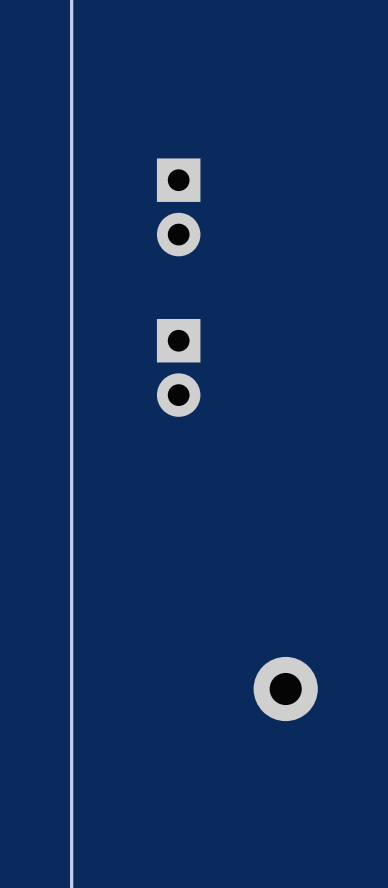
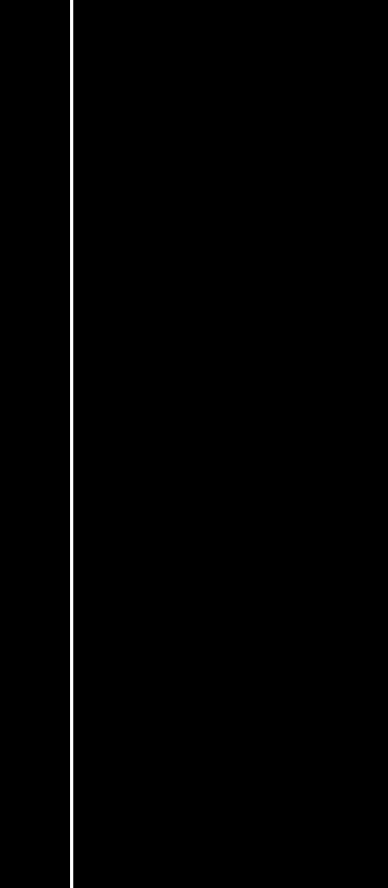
part: (178, 207) -> none
part: (178, 367) -> none
part: (285, 689) -> none

